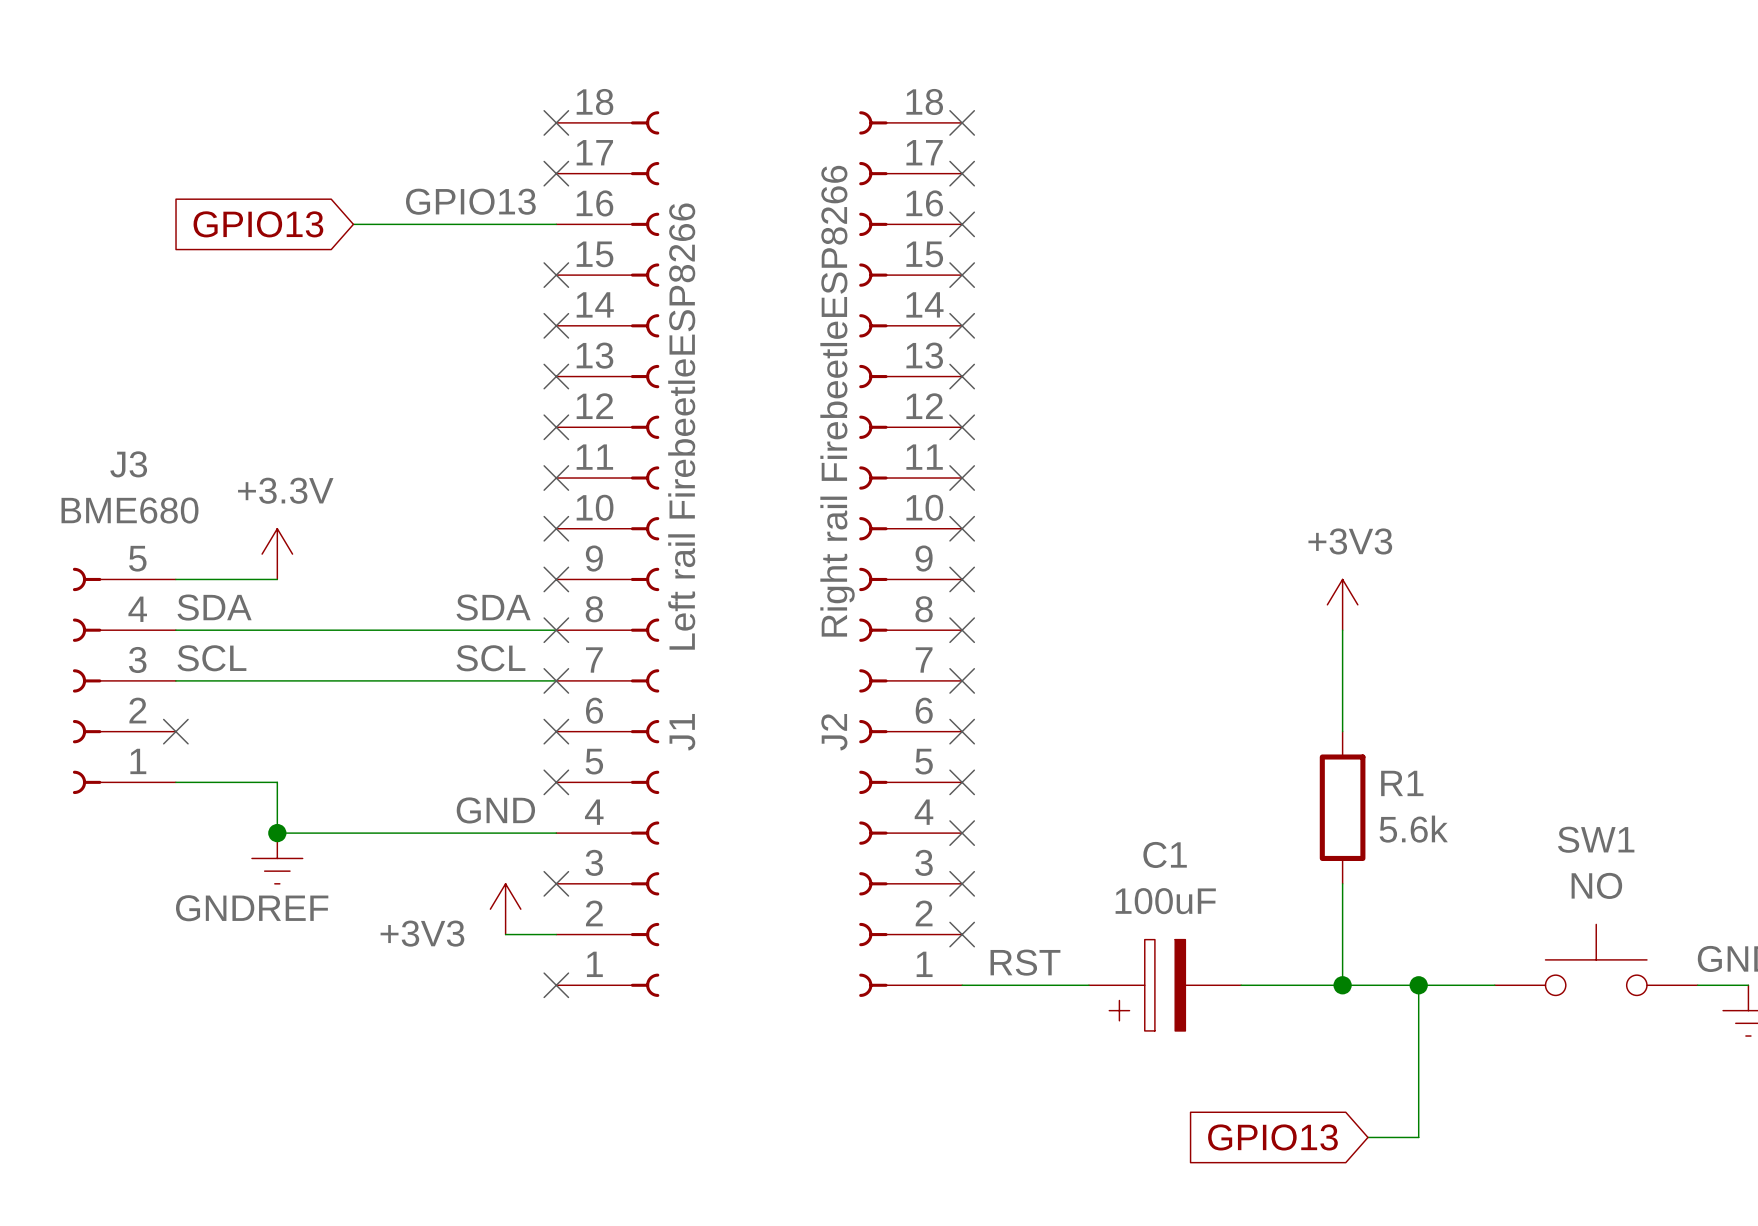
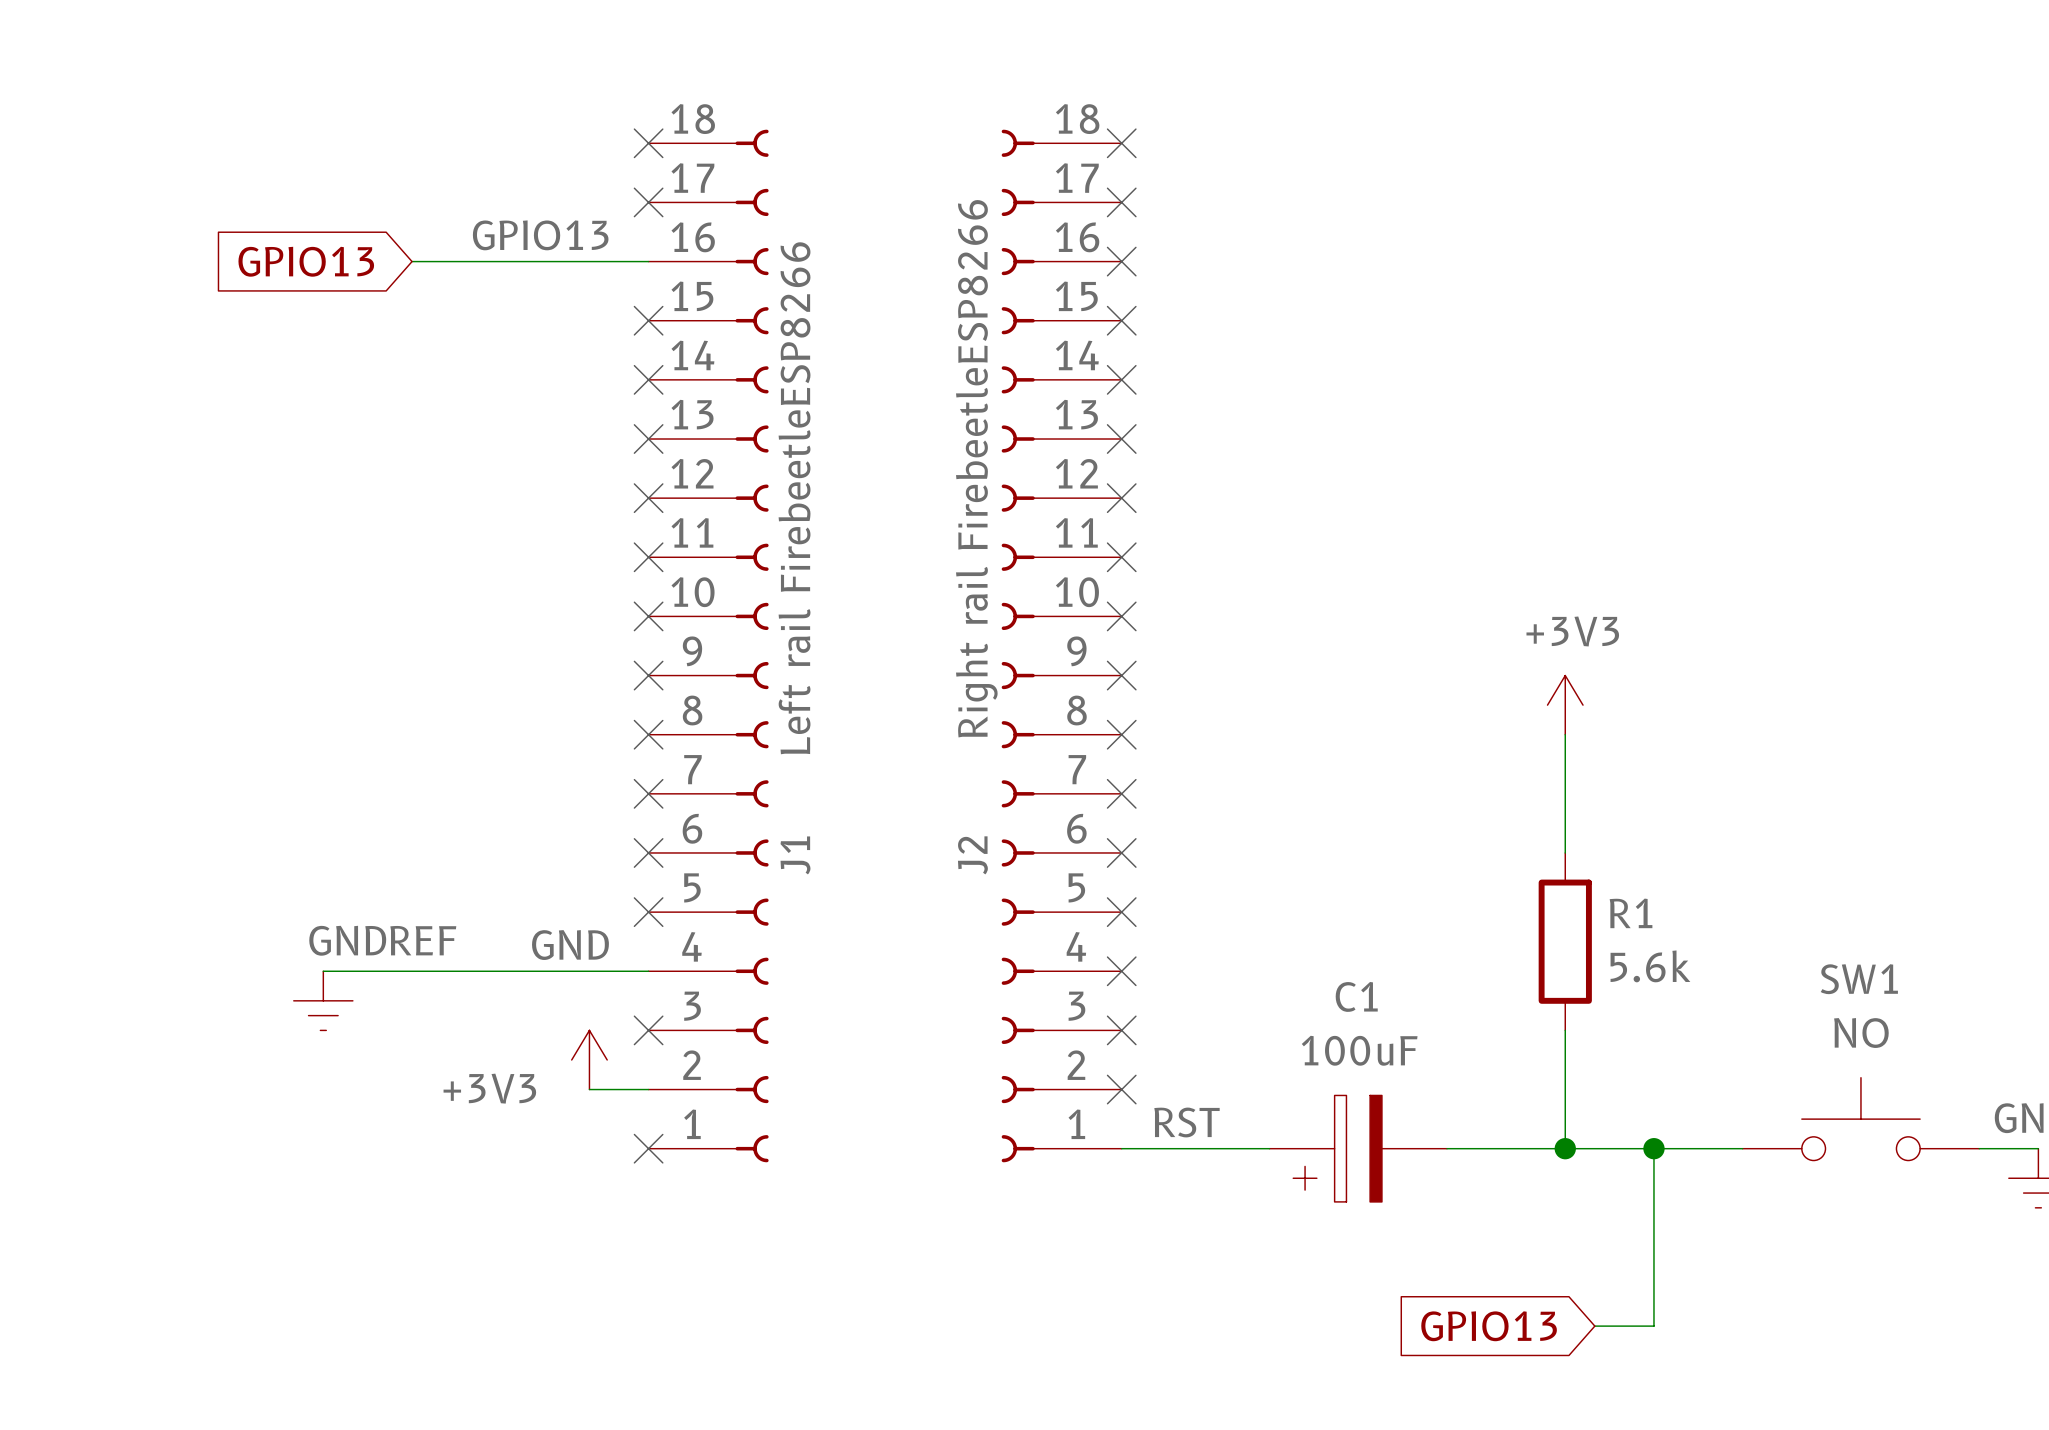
power symbol: +3.3V (277, 554) -> none
wire: (175, 579) (277, 579) -> none
label: SDA (214, 607) -> none
label: SDA (493, 607) -> none
wire: (175, 630) (556, 630) -> none
label: SCL (211, 658) -> none
label: SCL (490, 658) -> none
J3: BME680 (124, 680) -> none
wire: (175, 680) (556, 680) -> none
no-connect mark: (175, 731) -> none
wire: (175, 782) (277, 782) (277, 833) -> none
junction: (277, 833) -> none
power symbol text position: GNDREF (252, 908) -> GNDREF (382, 940)

